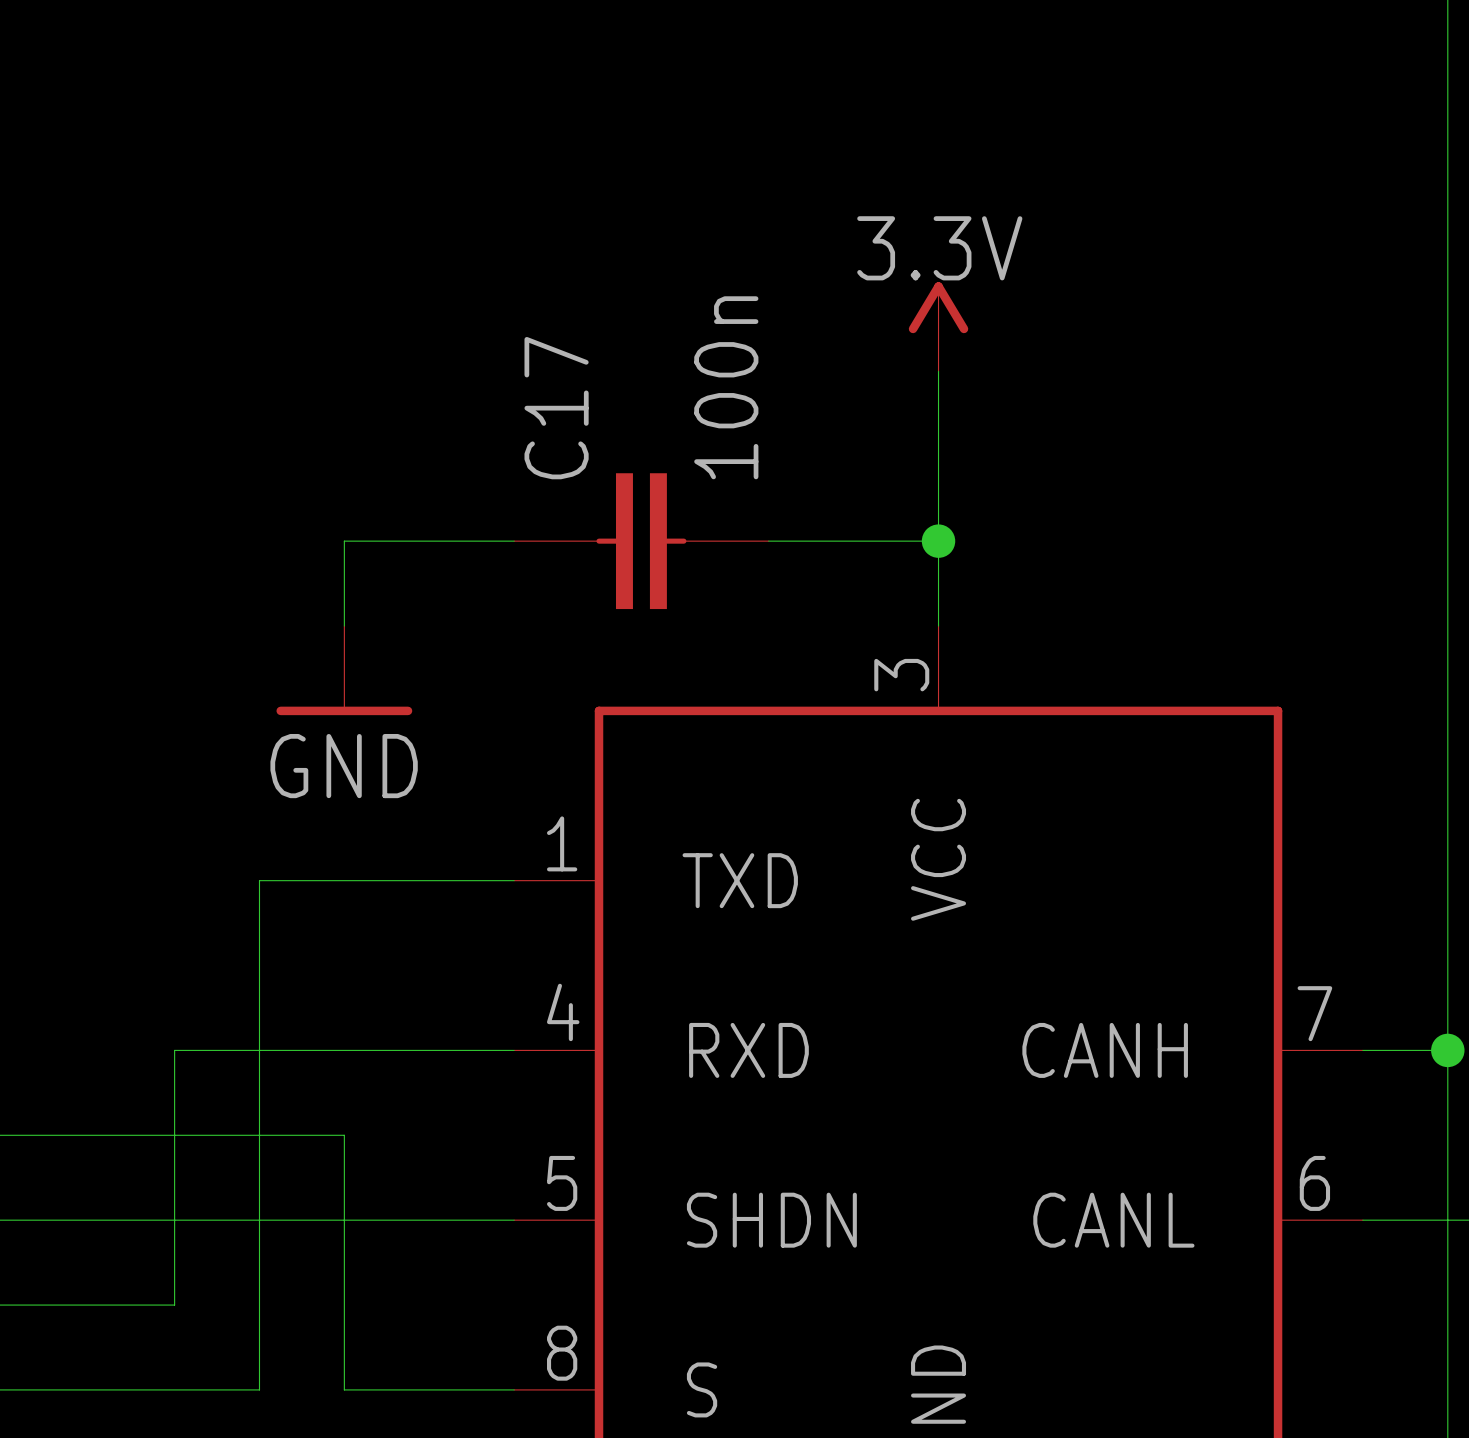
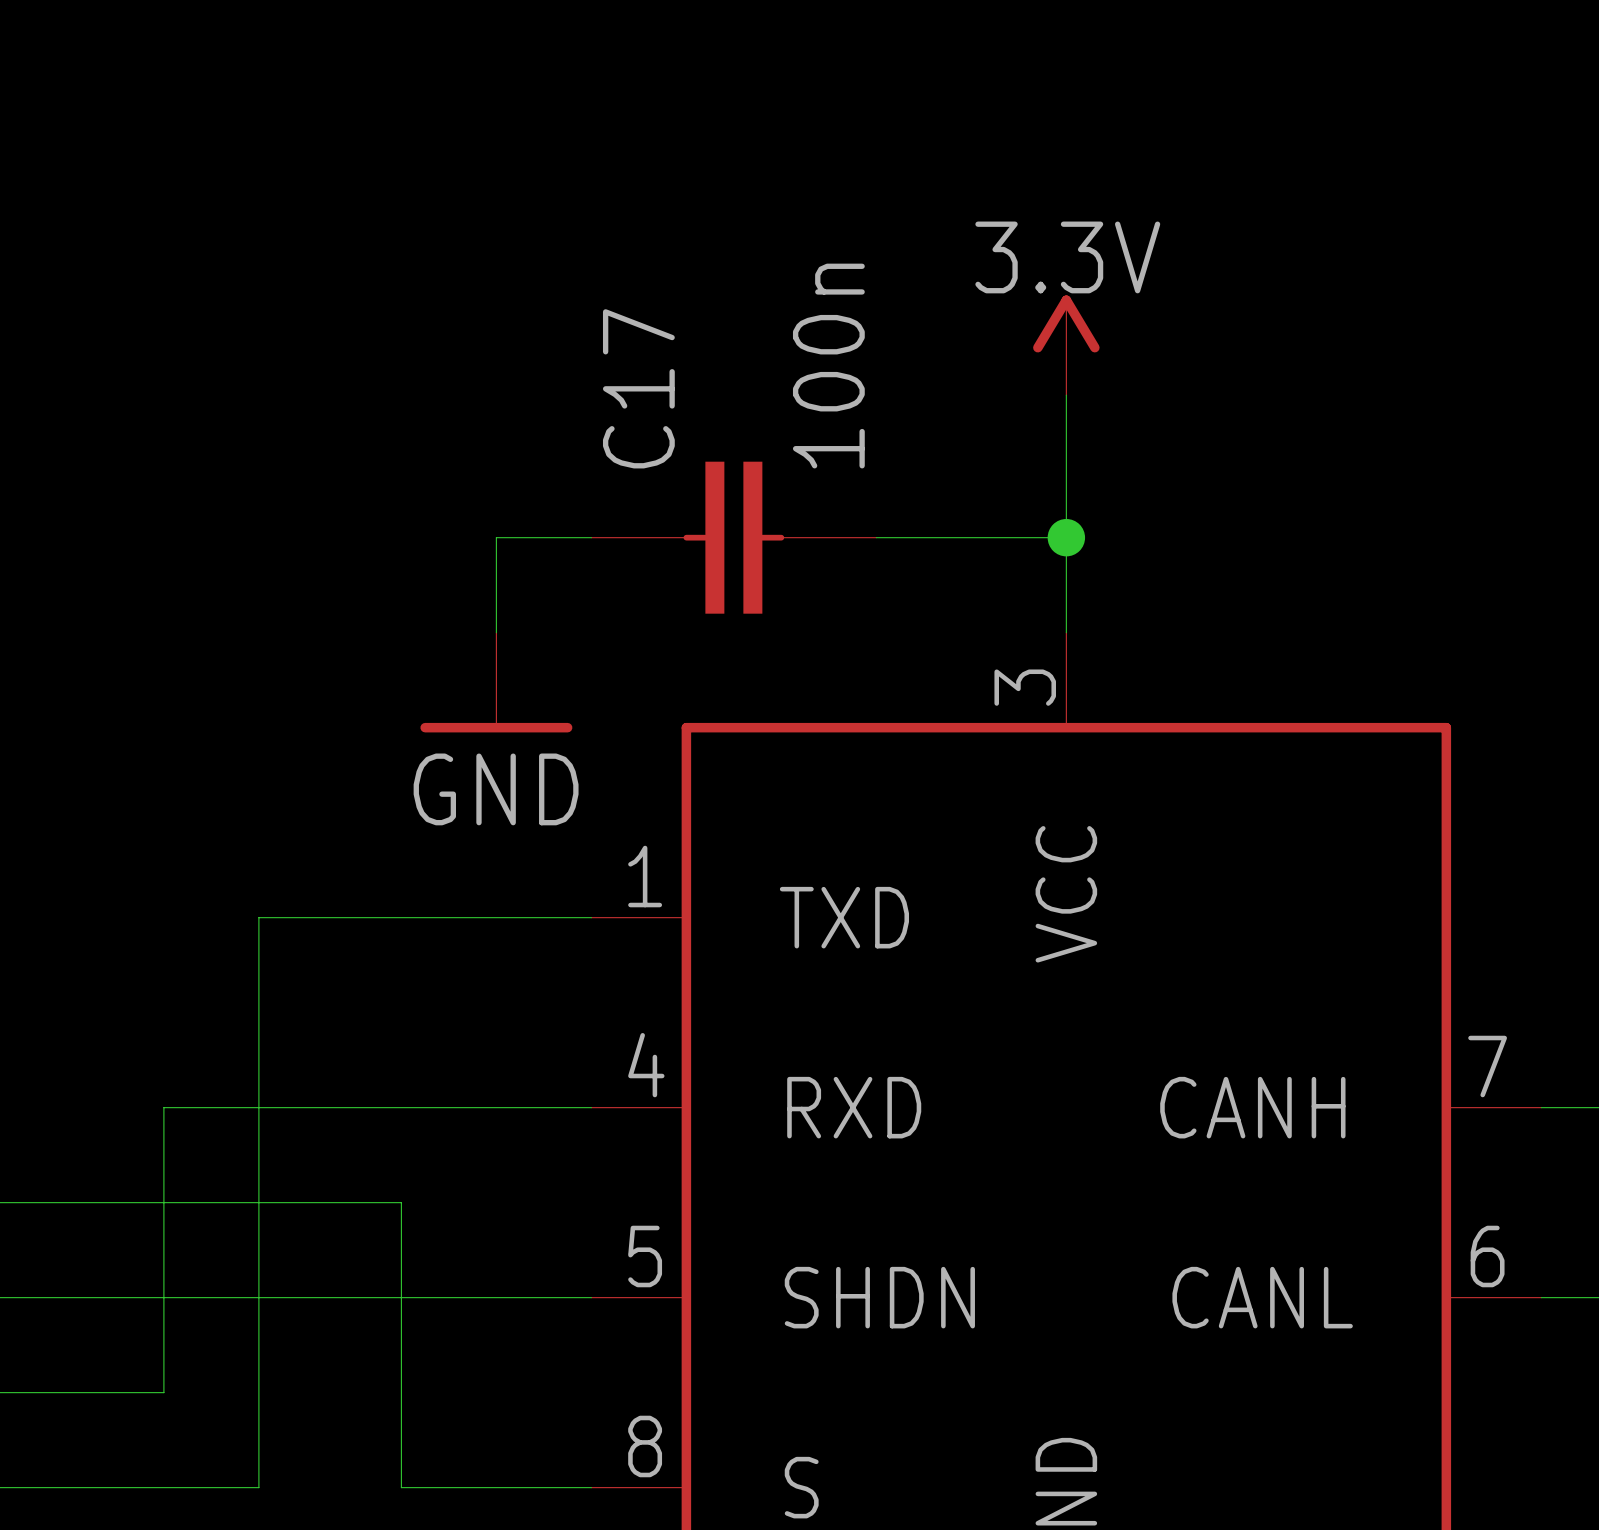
power symbol position: 3.3V (938, 326) -> 3.3V (1066, 345)
wire: (429, 541) (344, 541) (344, 626) -> (496, 537) (496, 632)
power symbol position: GND (344, 670) -> GND (496, 682)
wire: (259, 880) (259, 1389) (217, 1389) -> (306, 917) (258, 917) (258, 1487)
wire: (174, 1050) (174, 1305) (132, 1305) -> (211, 1107) (163, 1107) (163, 1392)

